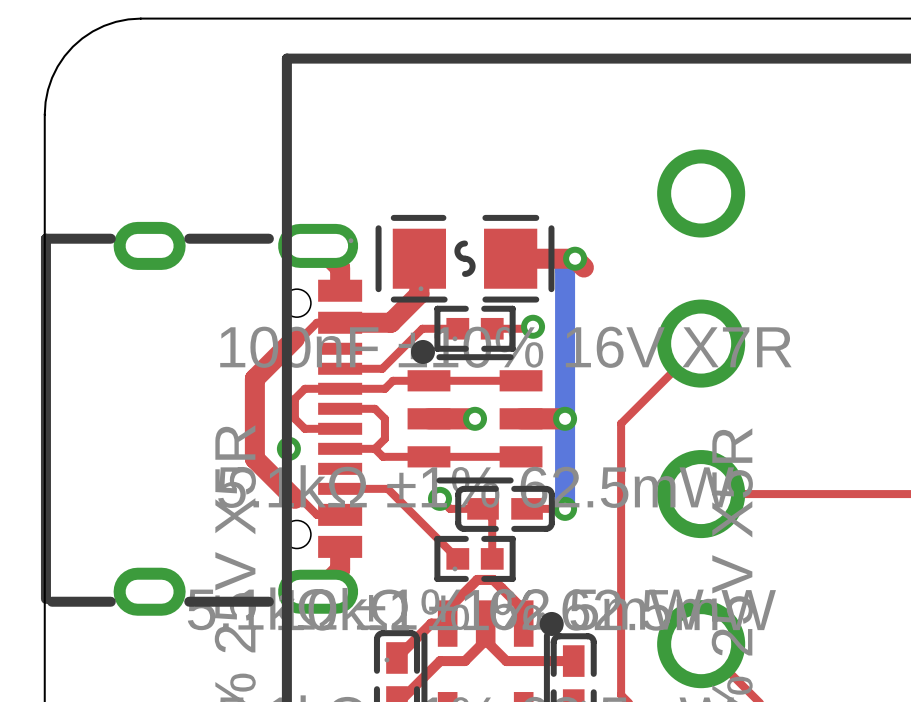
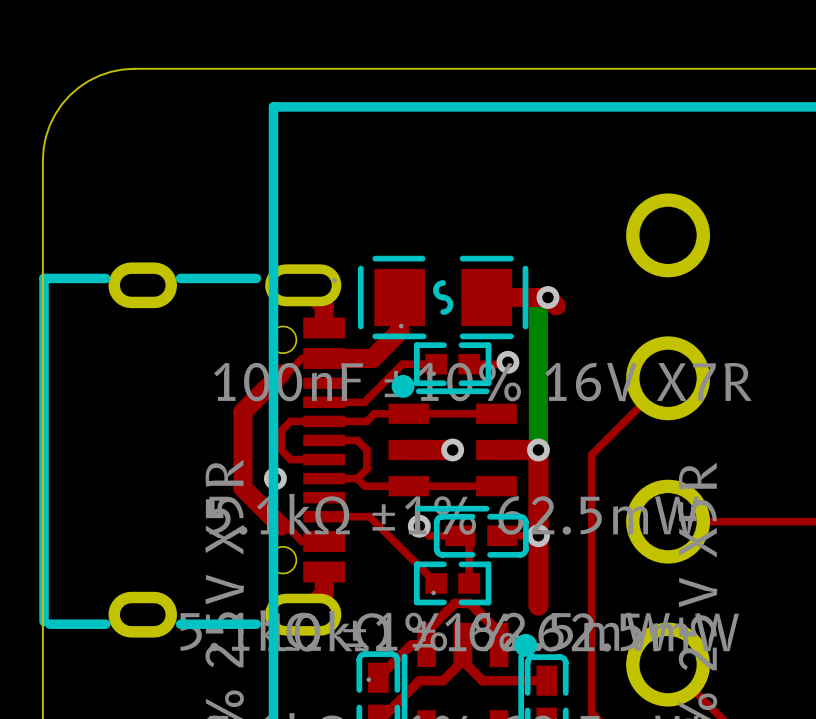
top track: none -> (538, 449) (538, 605)

